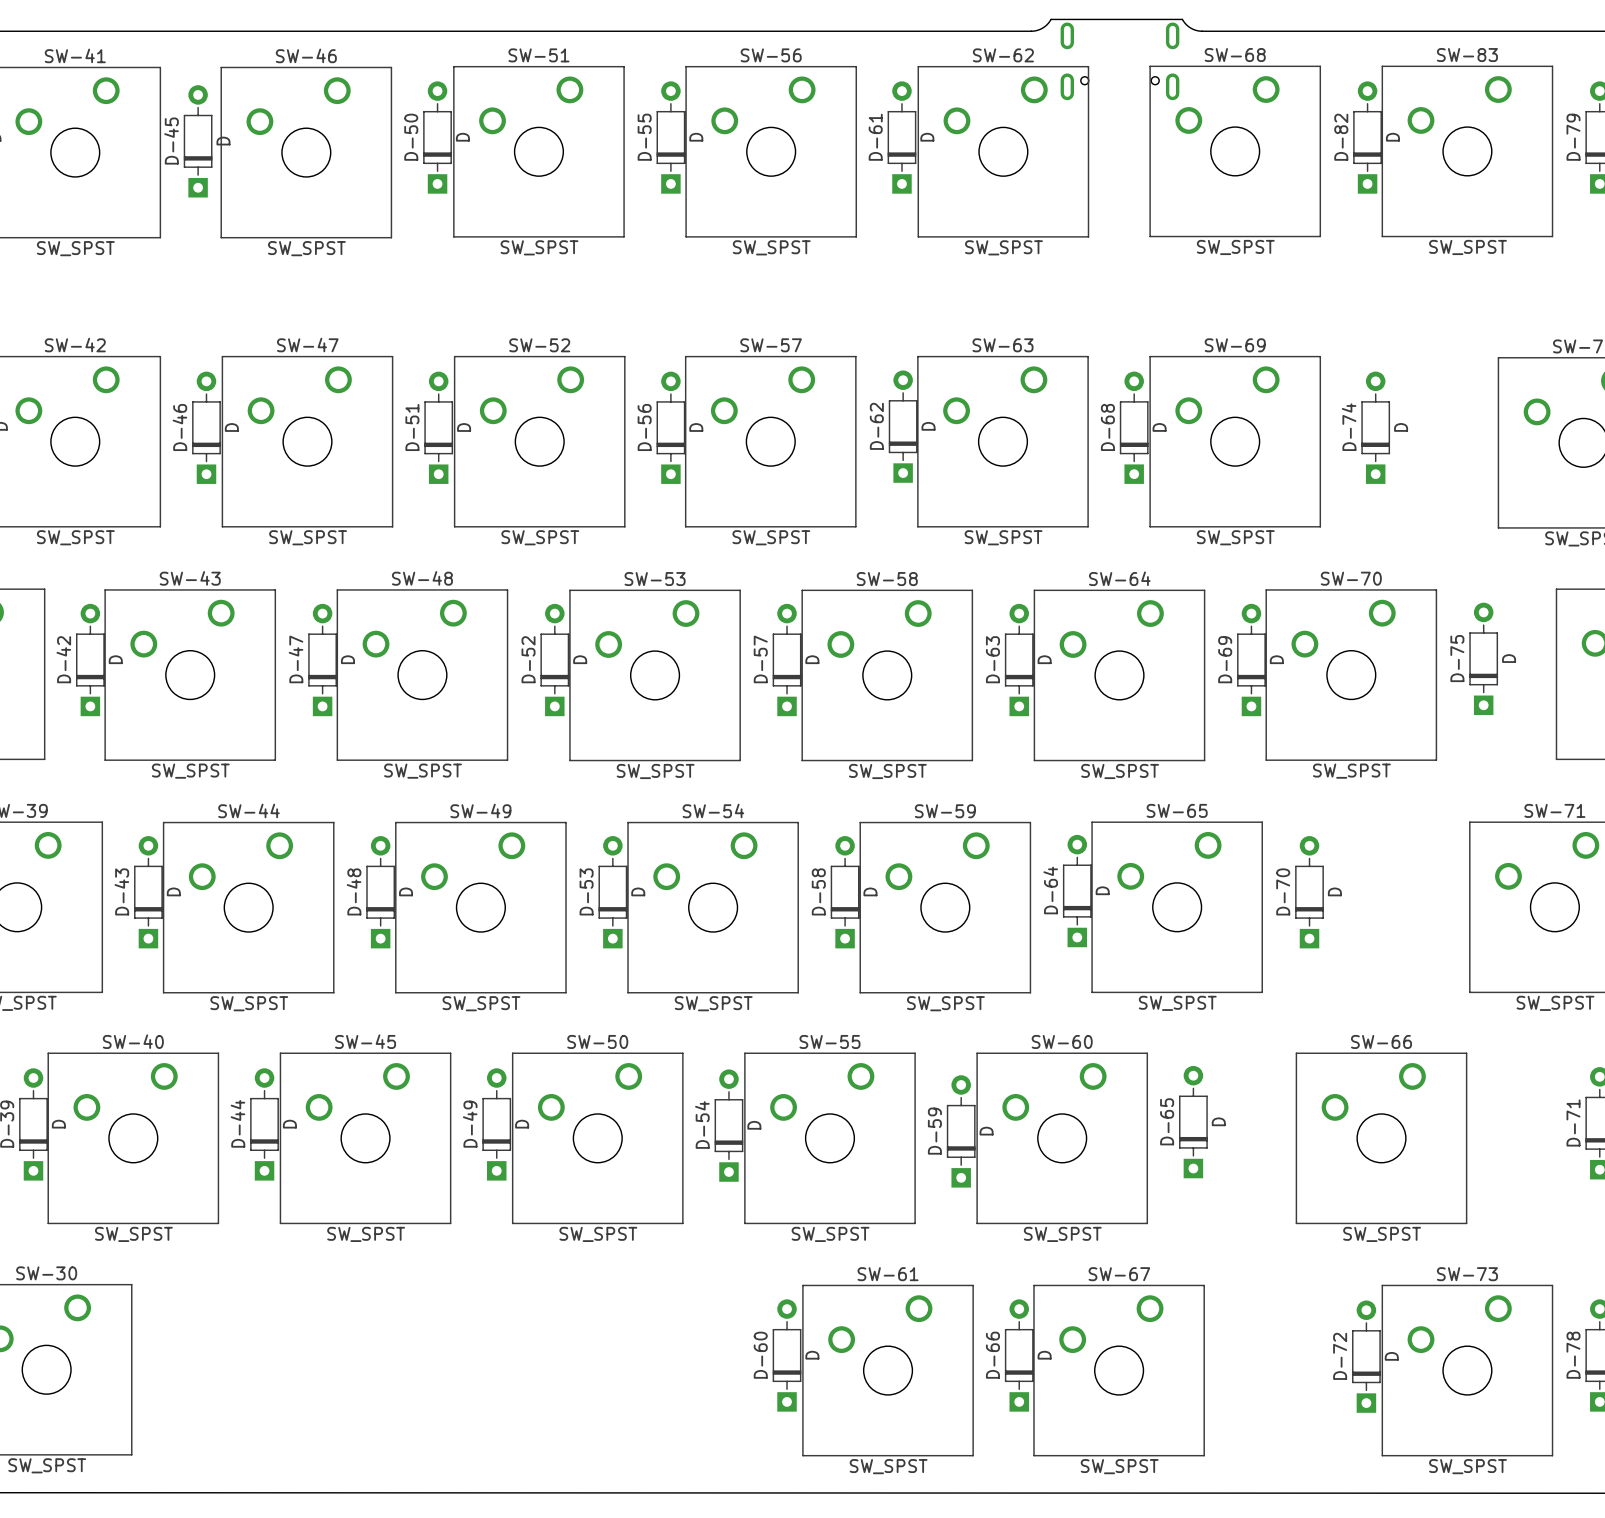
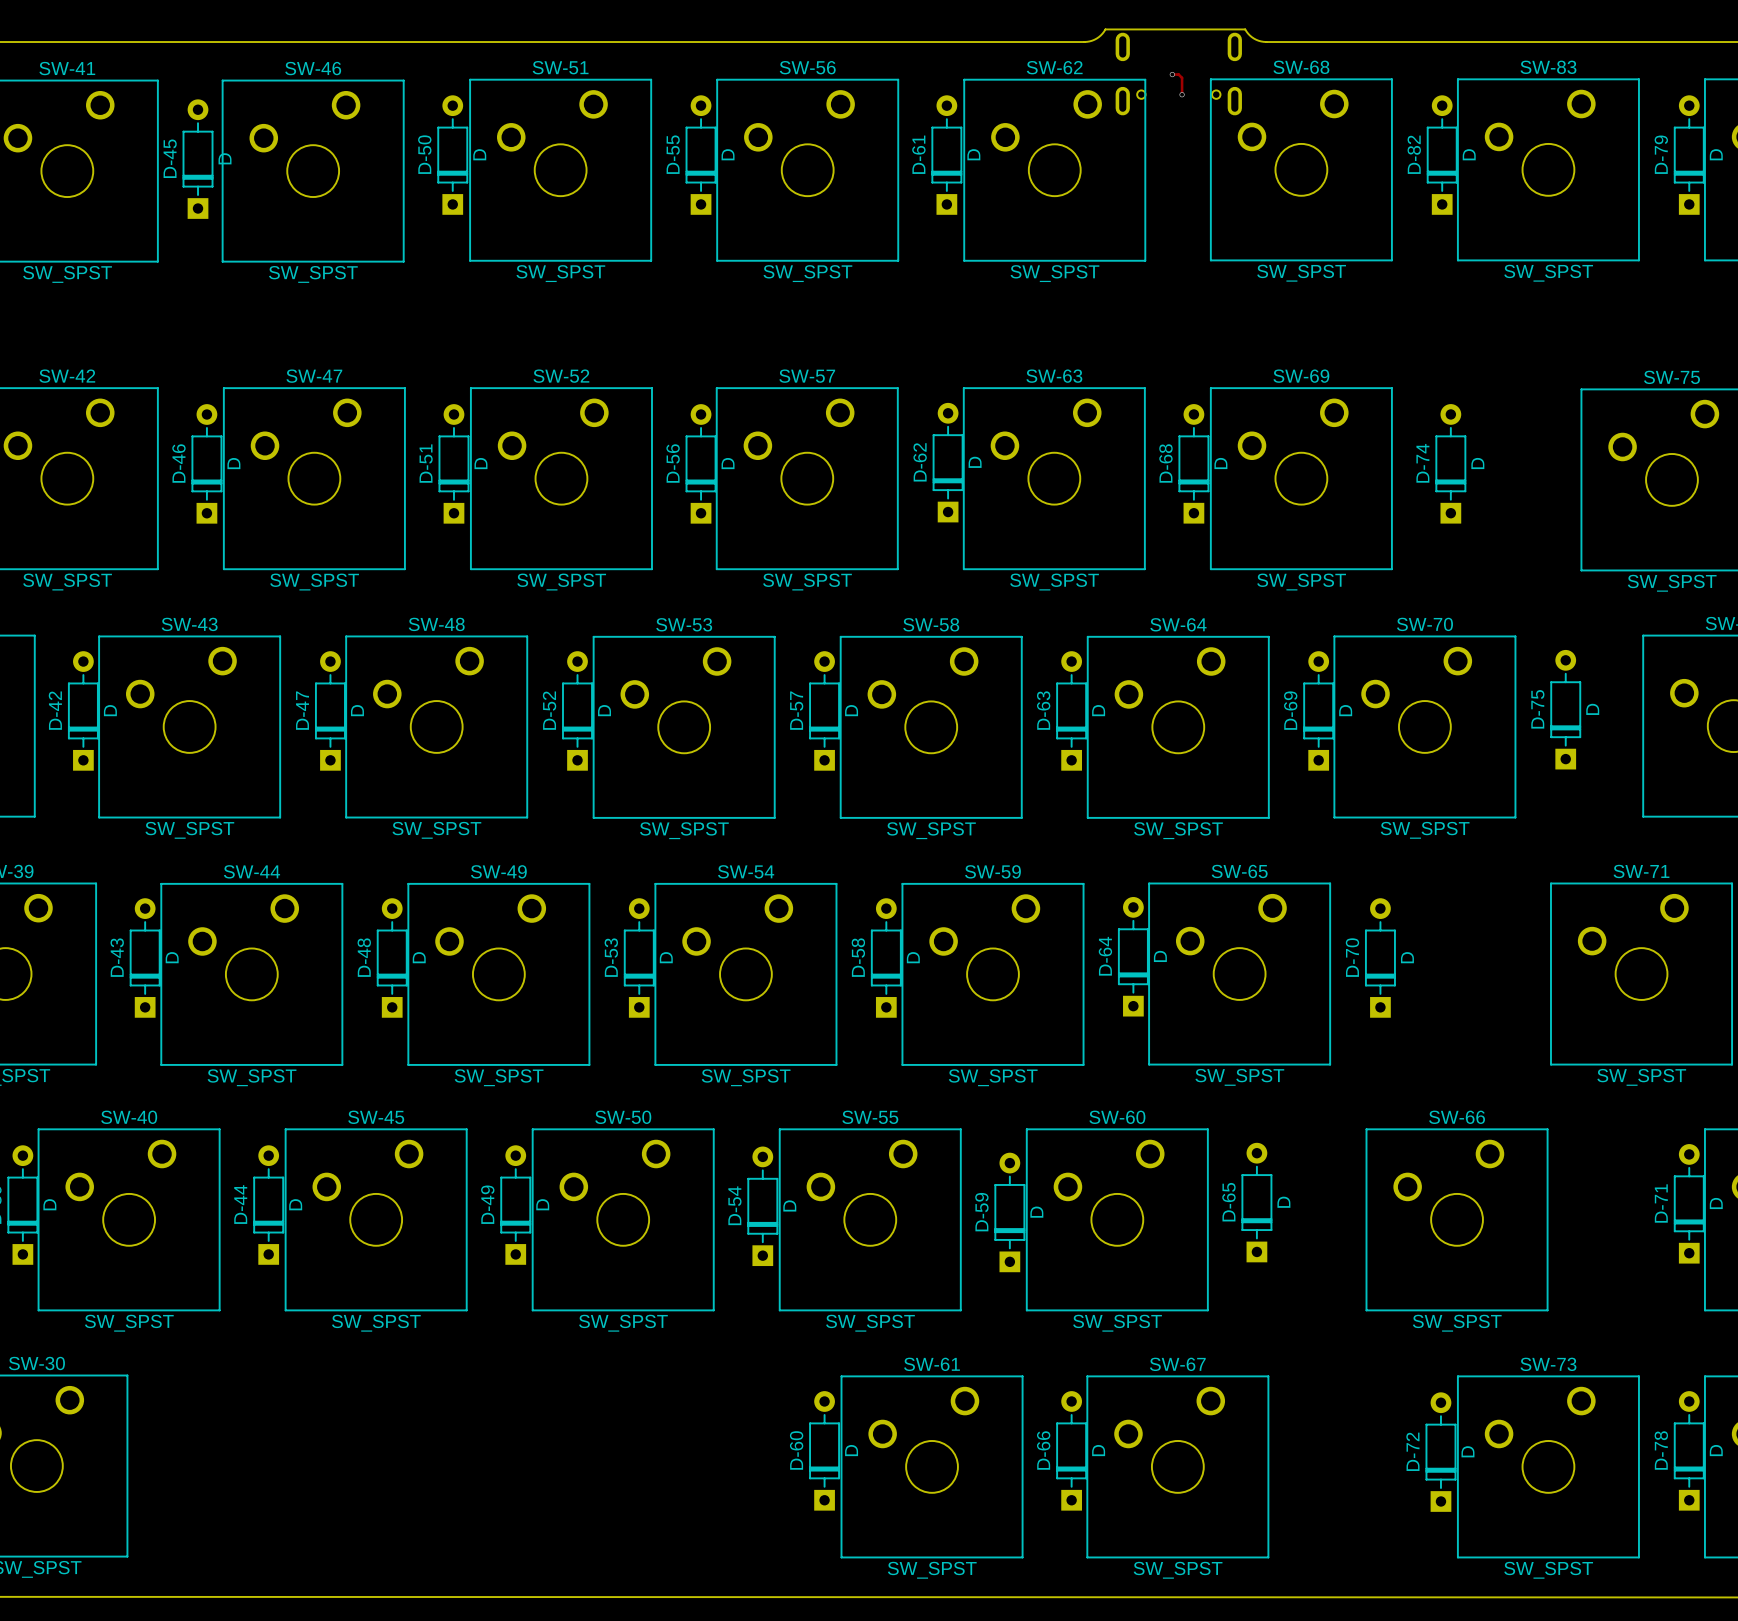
track: none -> (1172, 74) (1178, 74) (1182, 77) (1182, 95)
via: none -> (1172, 74)
via: none -> (1182, 94)

